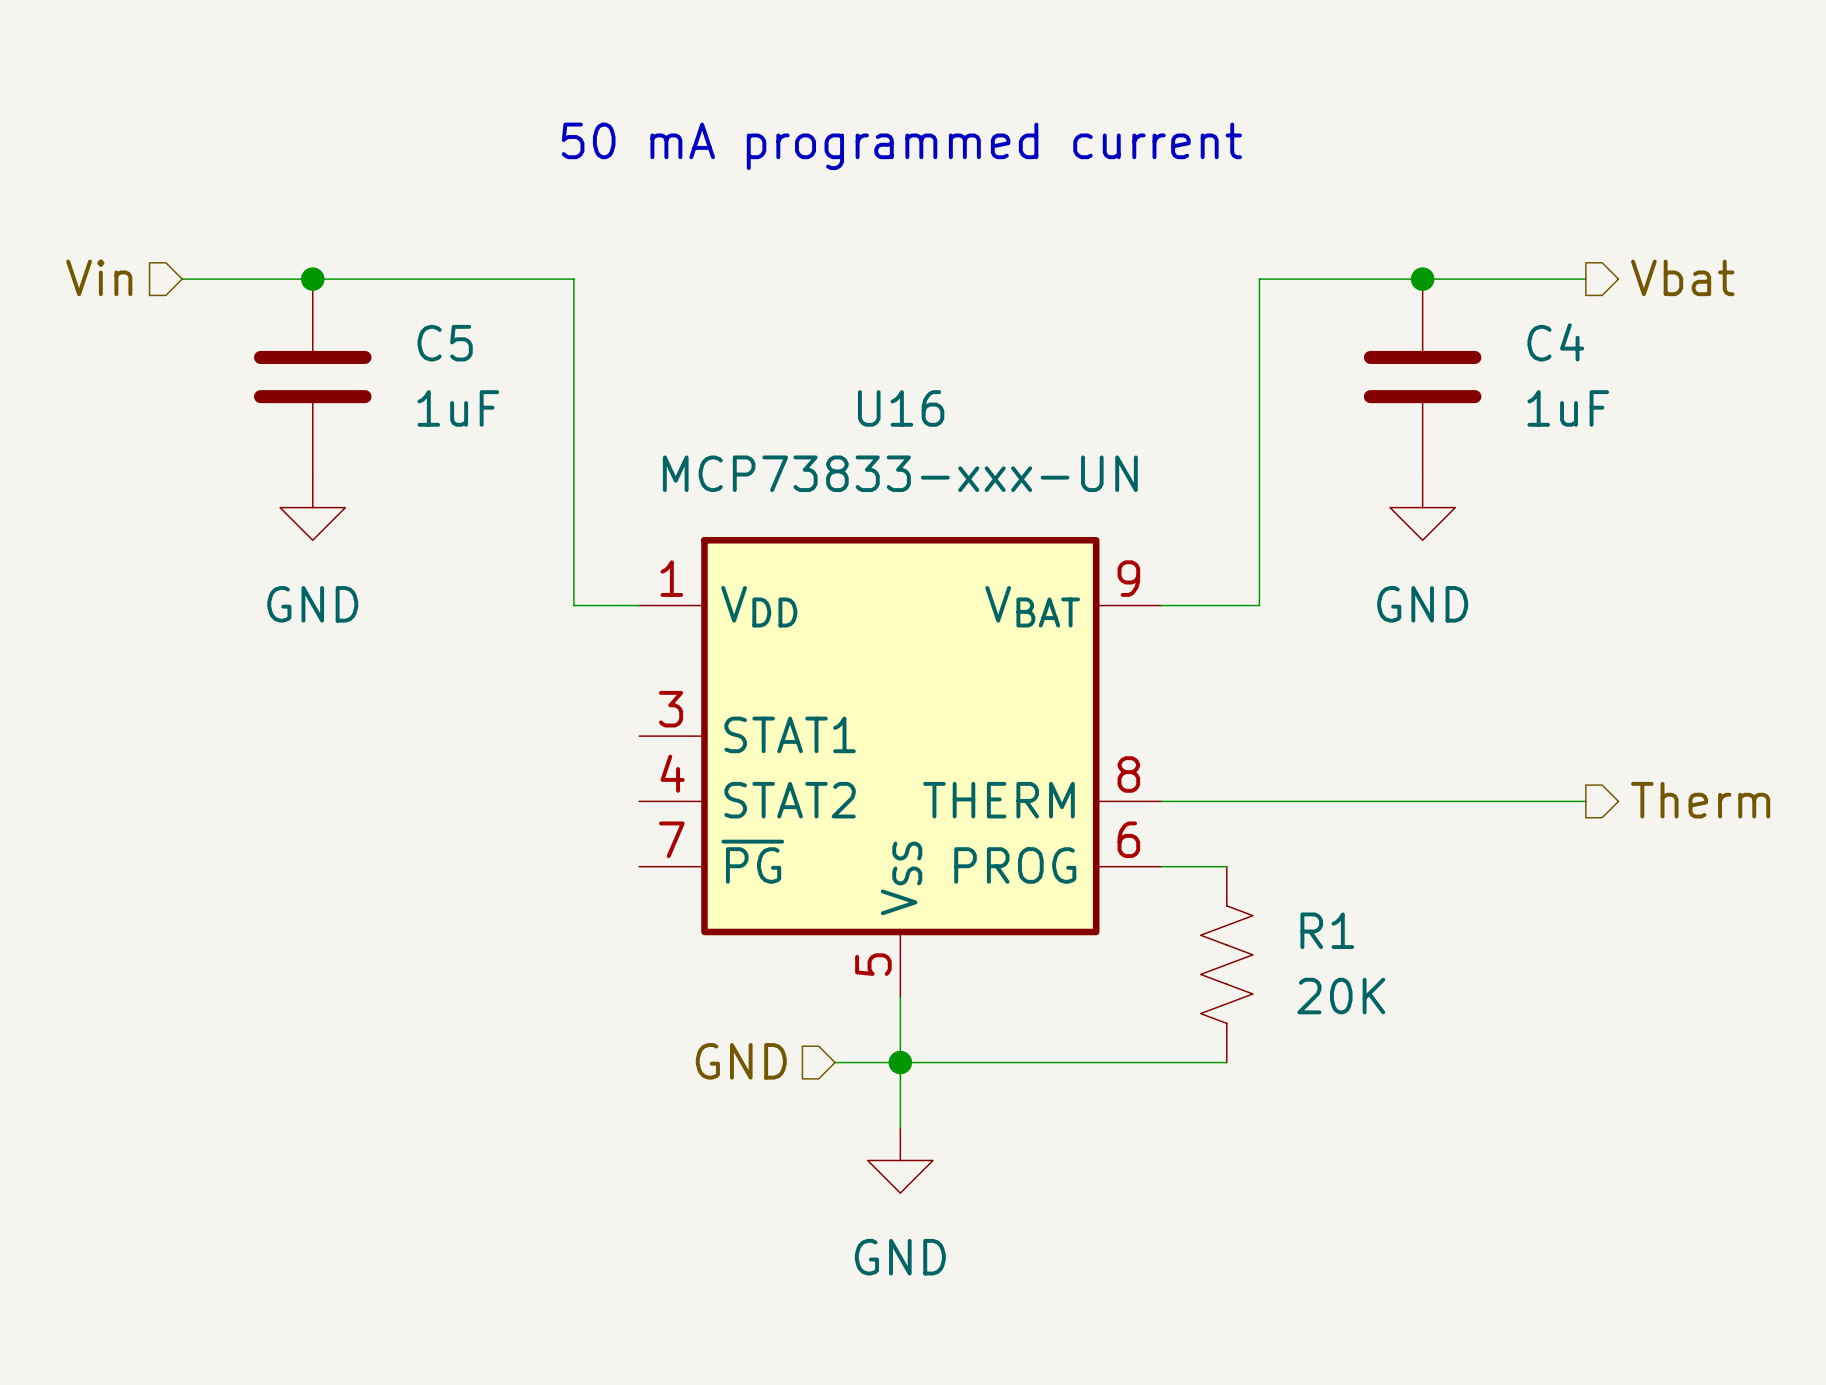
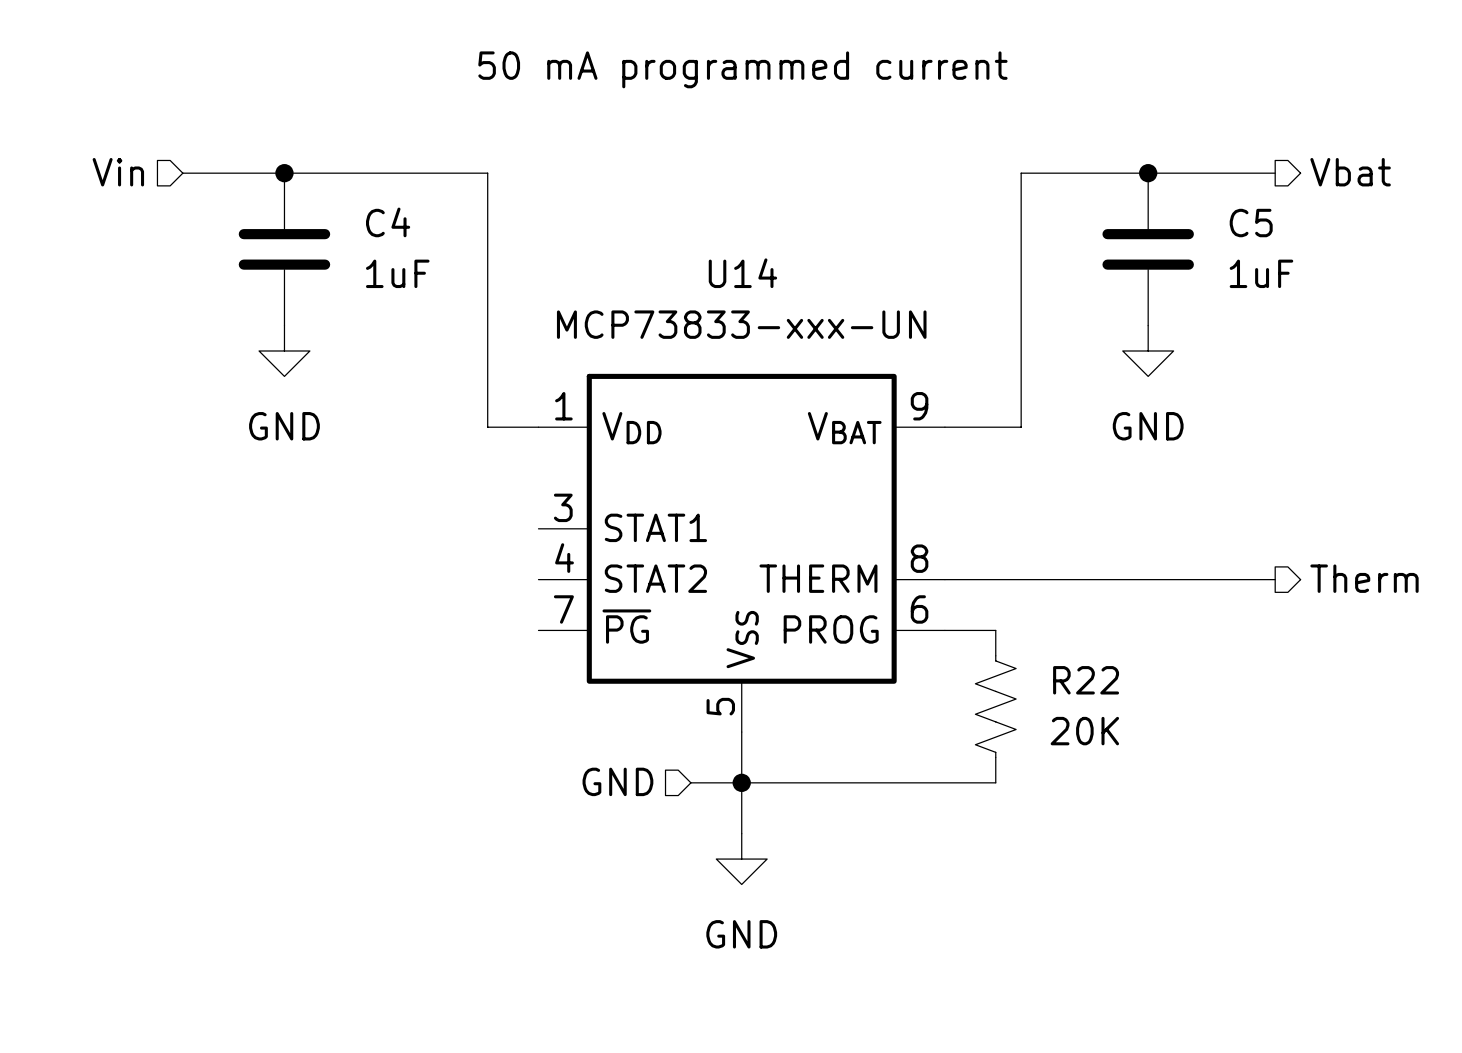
C4 name: C4 (1555, 342) -> C5 (1251, 223)
C5 name: C5 (445, 343) -> C4 (388, 222)
U16 name: U16 (901, 408) -> U14 (742, 273)
R1 name: R1 (1327, 930) -> R22 (1086, 680)

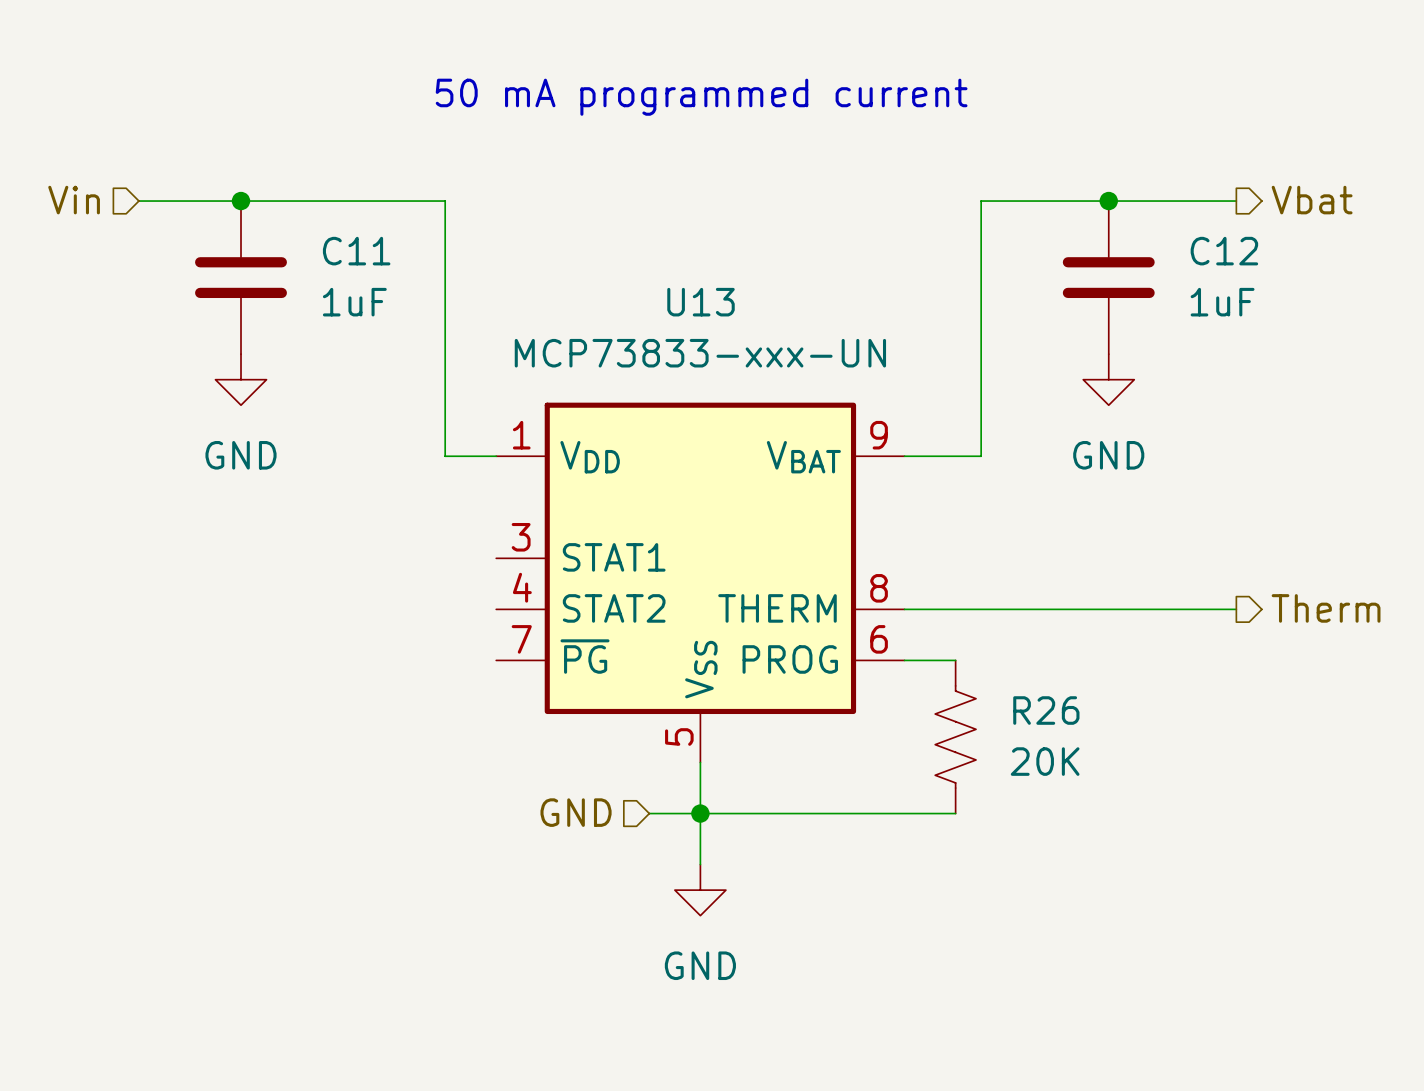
C4 name: C4 (388, 222) -> C11 (356, 251)
C5 name: C5 (1251, 223) -> C12 (1224, 251)
U14 name: U14 (742, 273) -> U13 (701, 302)
R22 name: R22 (1086, 680) -> R26 (1046, 710)

